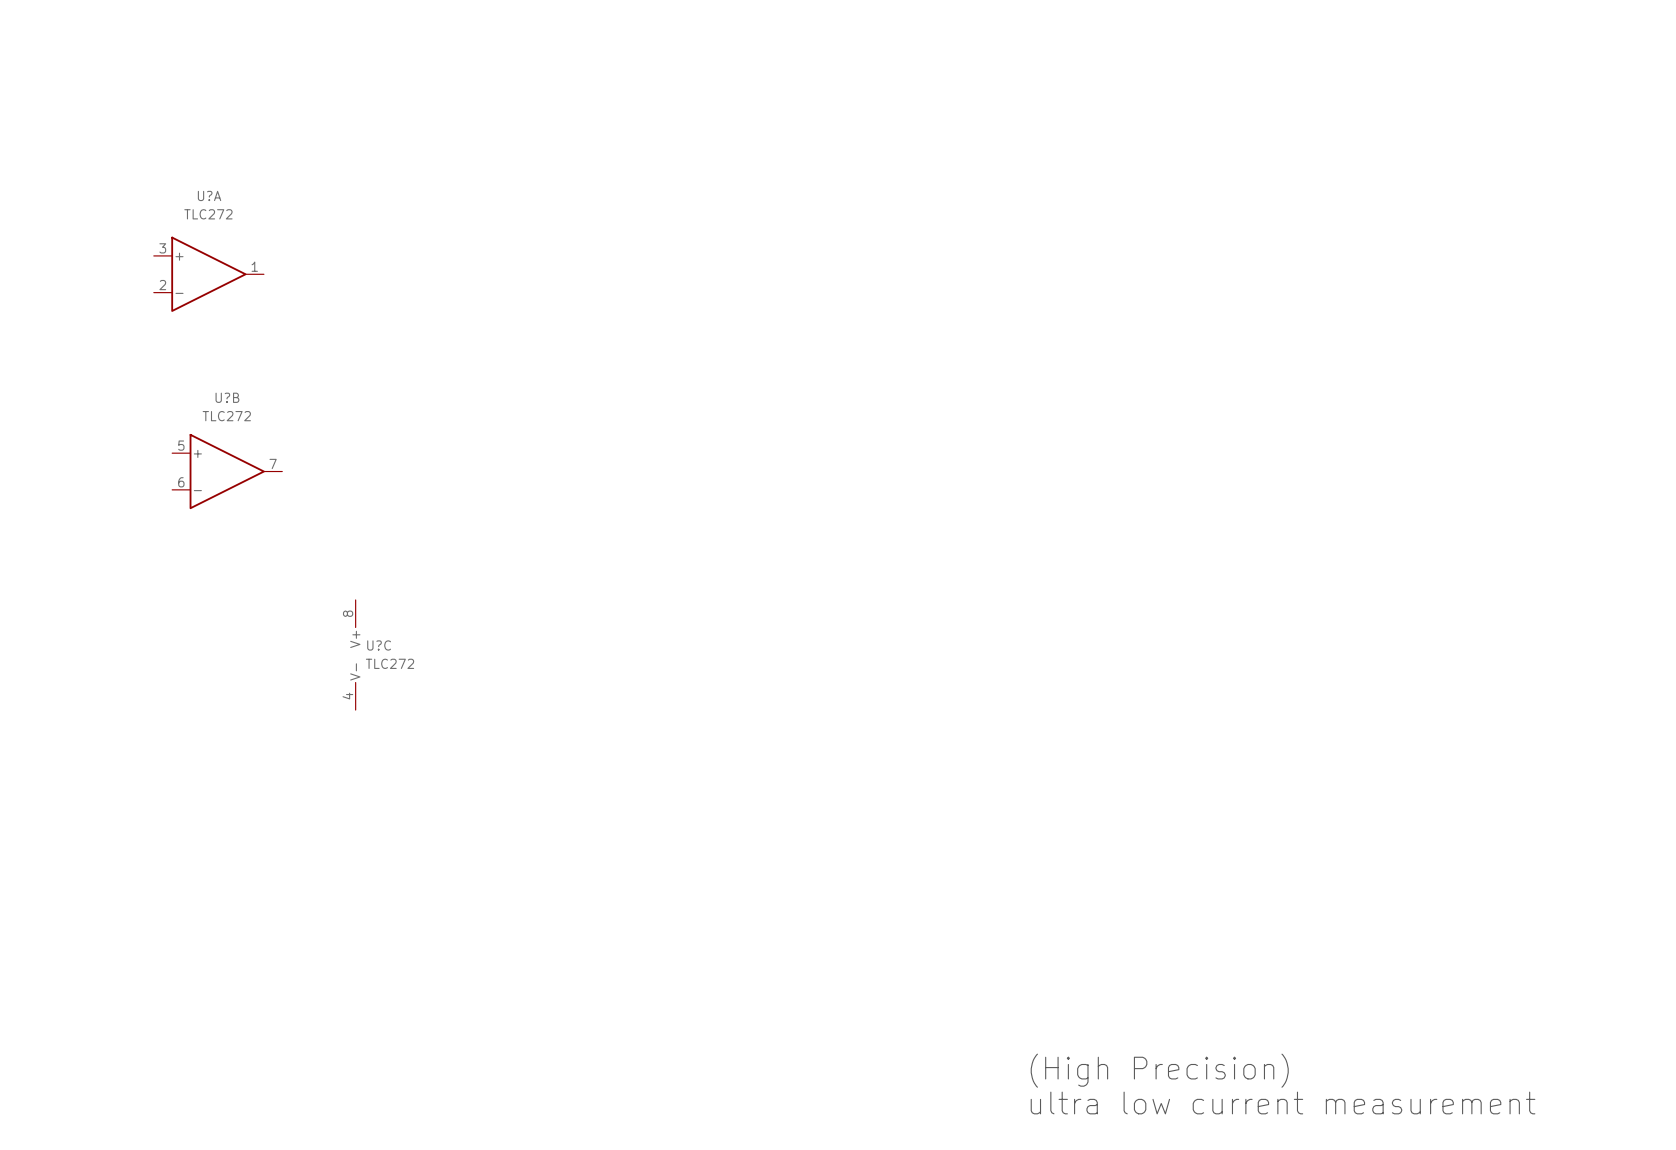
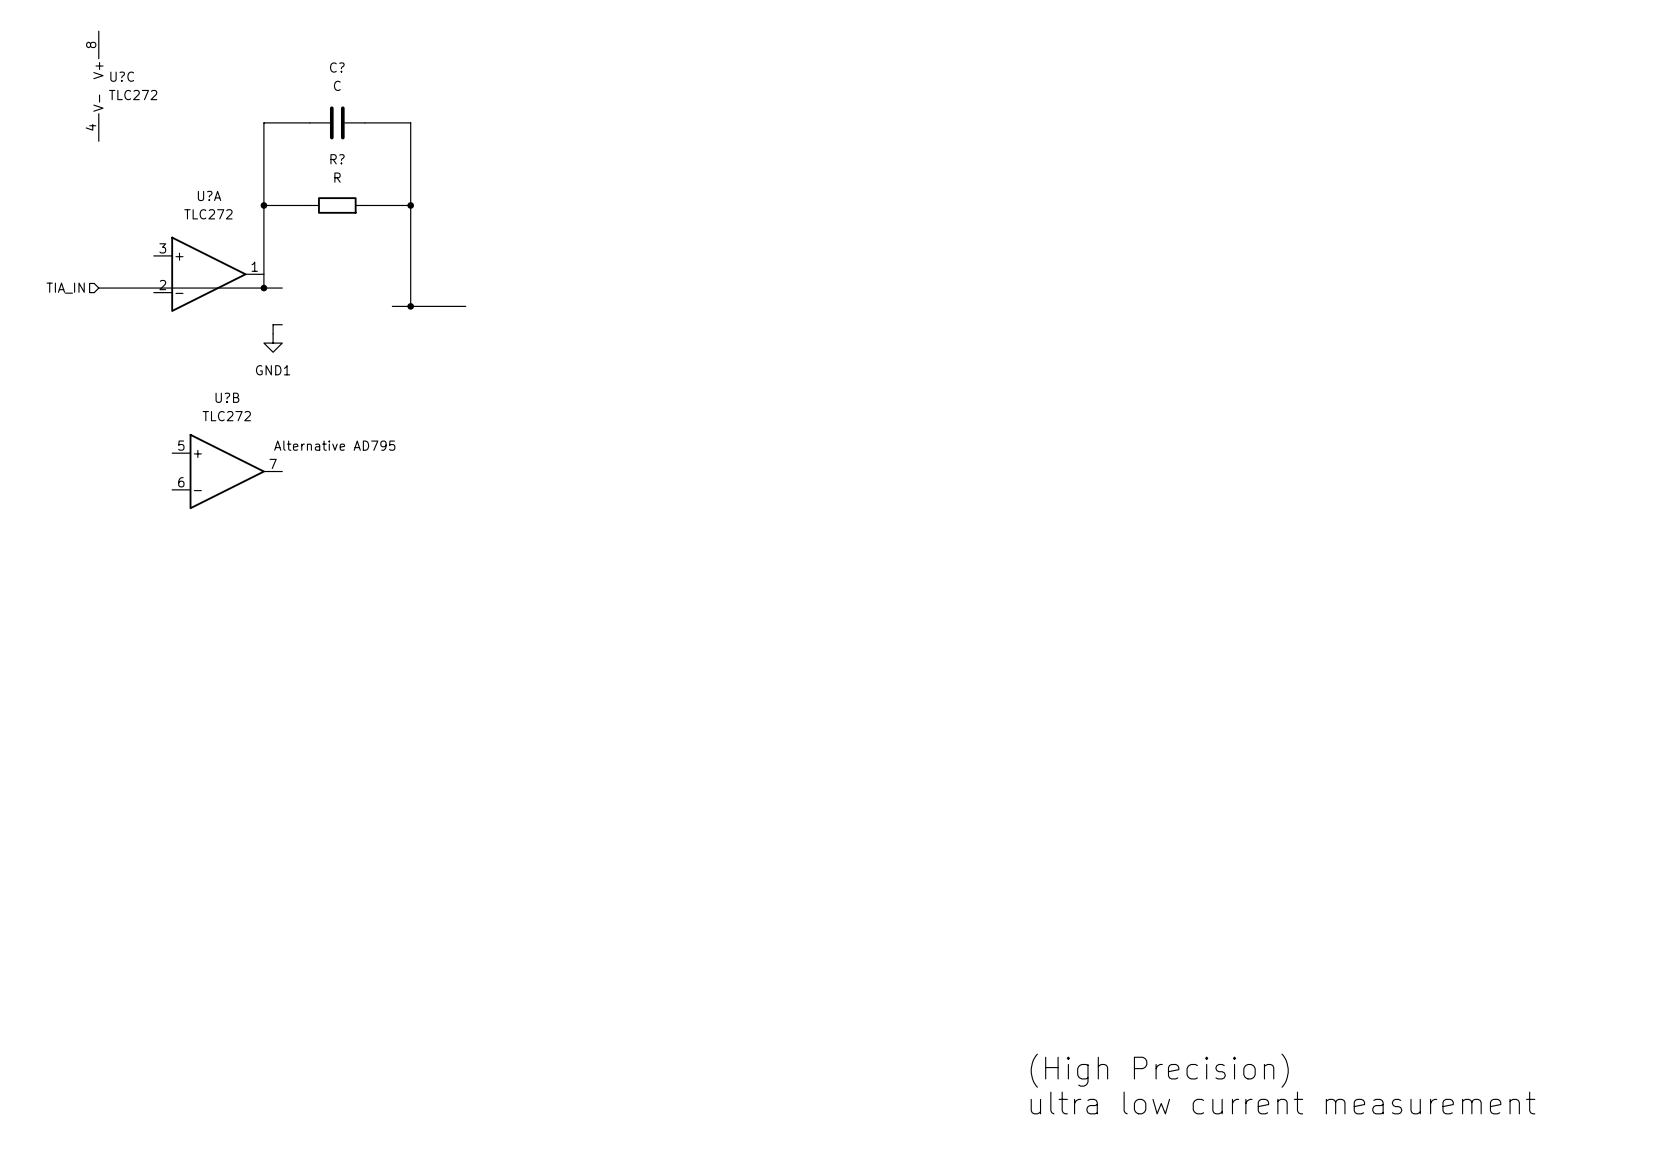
U?C: none -> TLC272 (98, 86)
wire: none -> (309, 122) (263, 122) (263, 288)
C?: none -> C (337, 122)
wire: none -> (364, 122) (410, 122) (410, 306)
wire: none -> (263, 205) (309, 205)
junction: none -> (263, 205)
R?: none -> R (337, 205)
wire: none -> (364, 205) (410, 205)
junction: none -> (410, 205)
hierarchical label: none -> TIA_IN (65, 288)
wire: none -> (98, 288) (282, 288)
junction: none -> (263, 288)
wire: none -> (392, 306) (465, 306)
junction: none -> (410, 306)
wire: none -> (282, 324) (273, 324) (273, 333)
power symbol: none -> GND1 (273, 343)
text: none -> Alternative AD795 (334, 445)
U?C: TLC272 (355, 655) -> none

